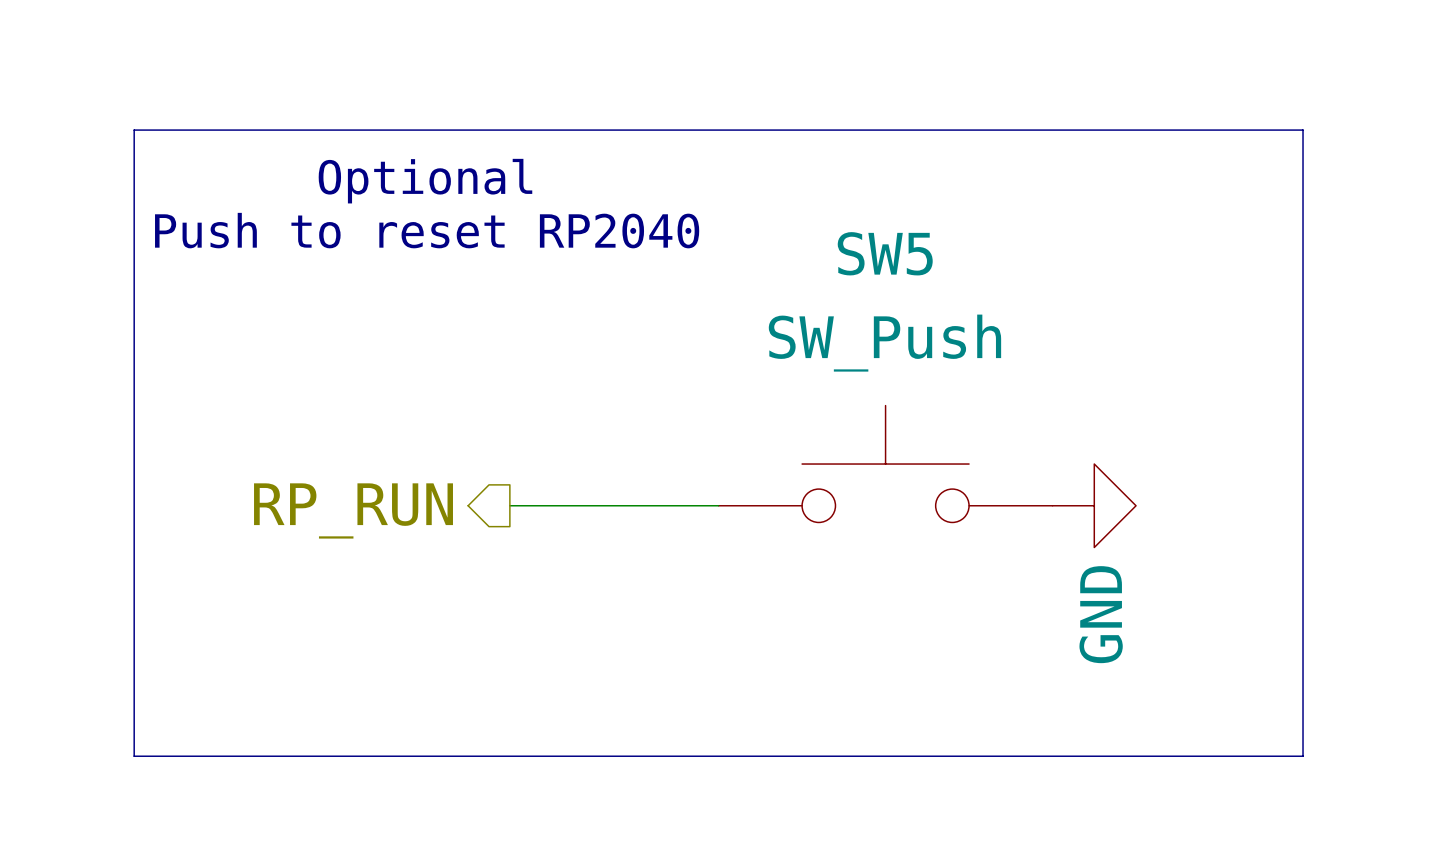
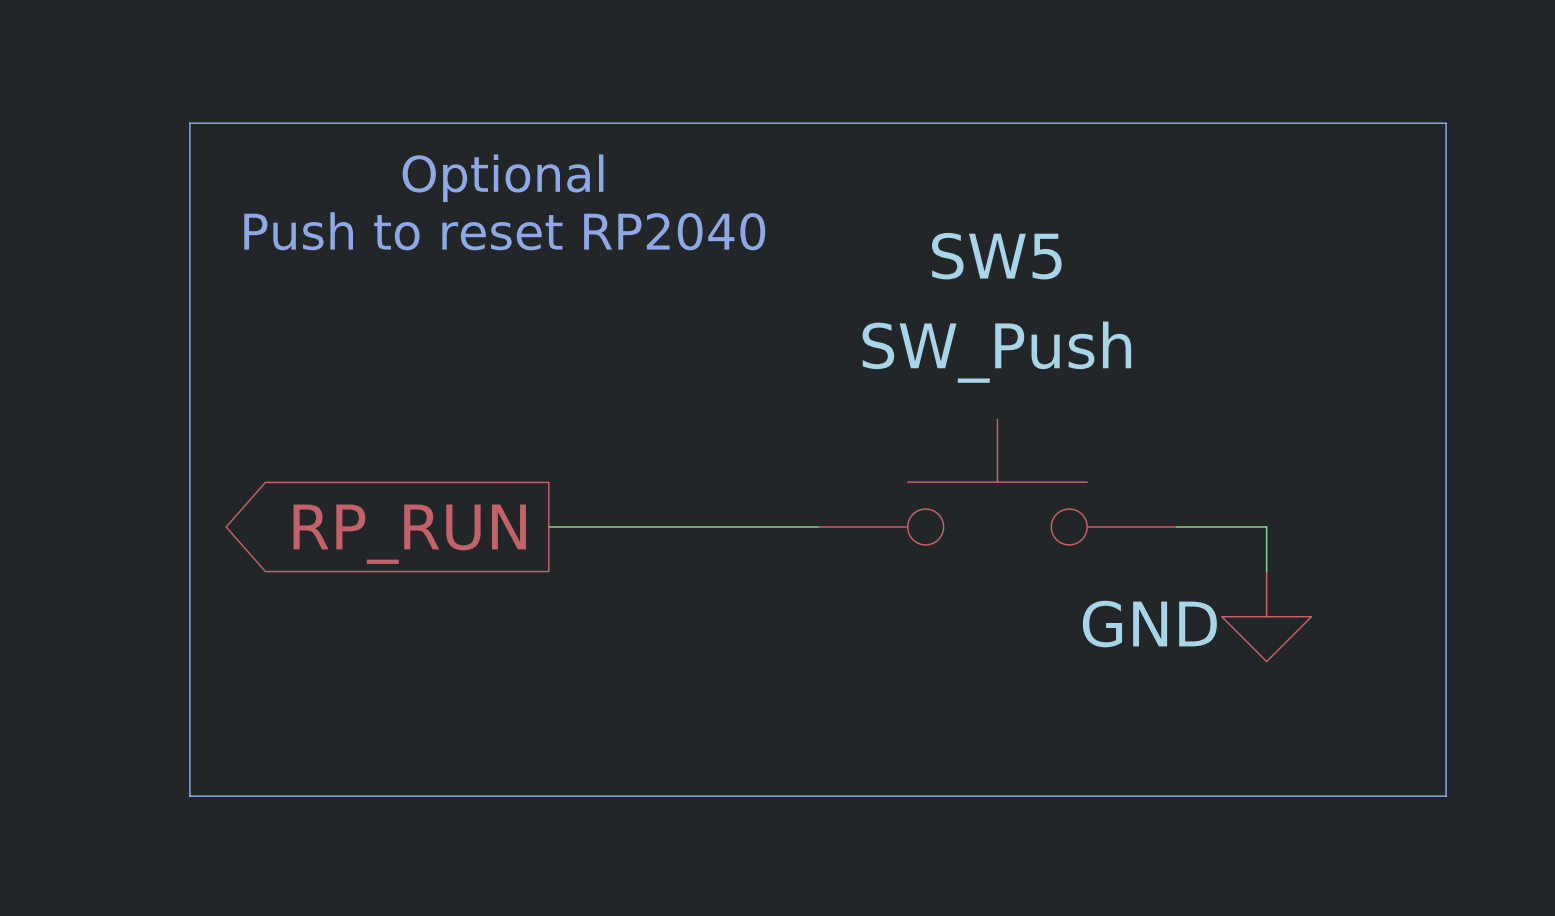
wire: none -> (548, 526) (593, 526)
wire: none -> (1176, 526) (1266, 526) (1266, 571)
power symbol rotation: 0° (1094, 505) -> 90° clockwise (1266, 616)
power symbol position: GND (1094, 505) -> GND (1266, 616)
hierarchical label: RP_RUN (353, 510) -> none
global label: none -> RP_RUN (409, 534)

